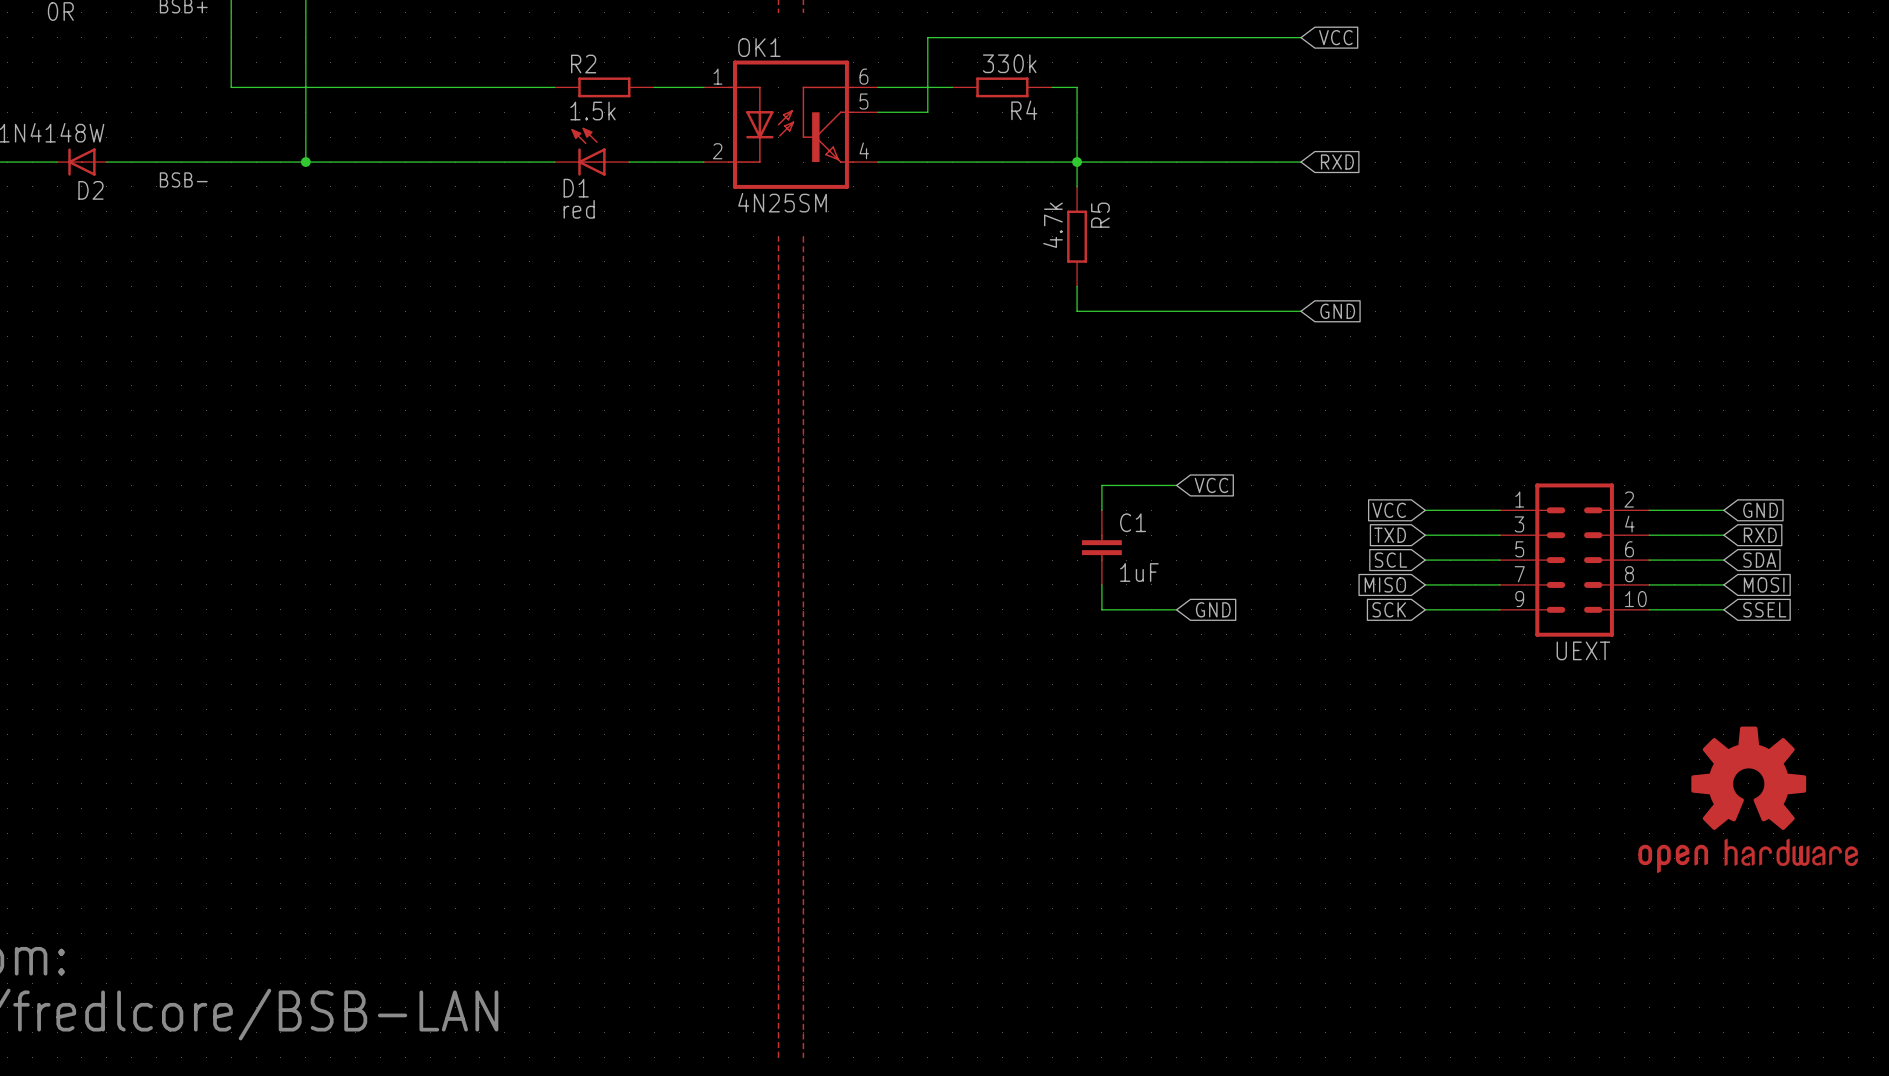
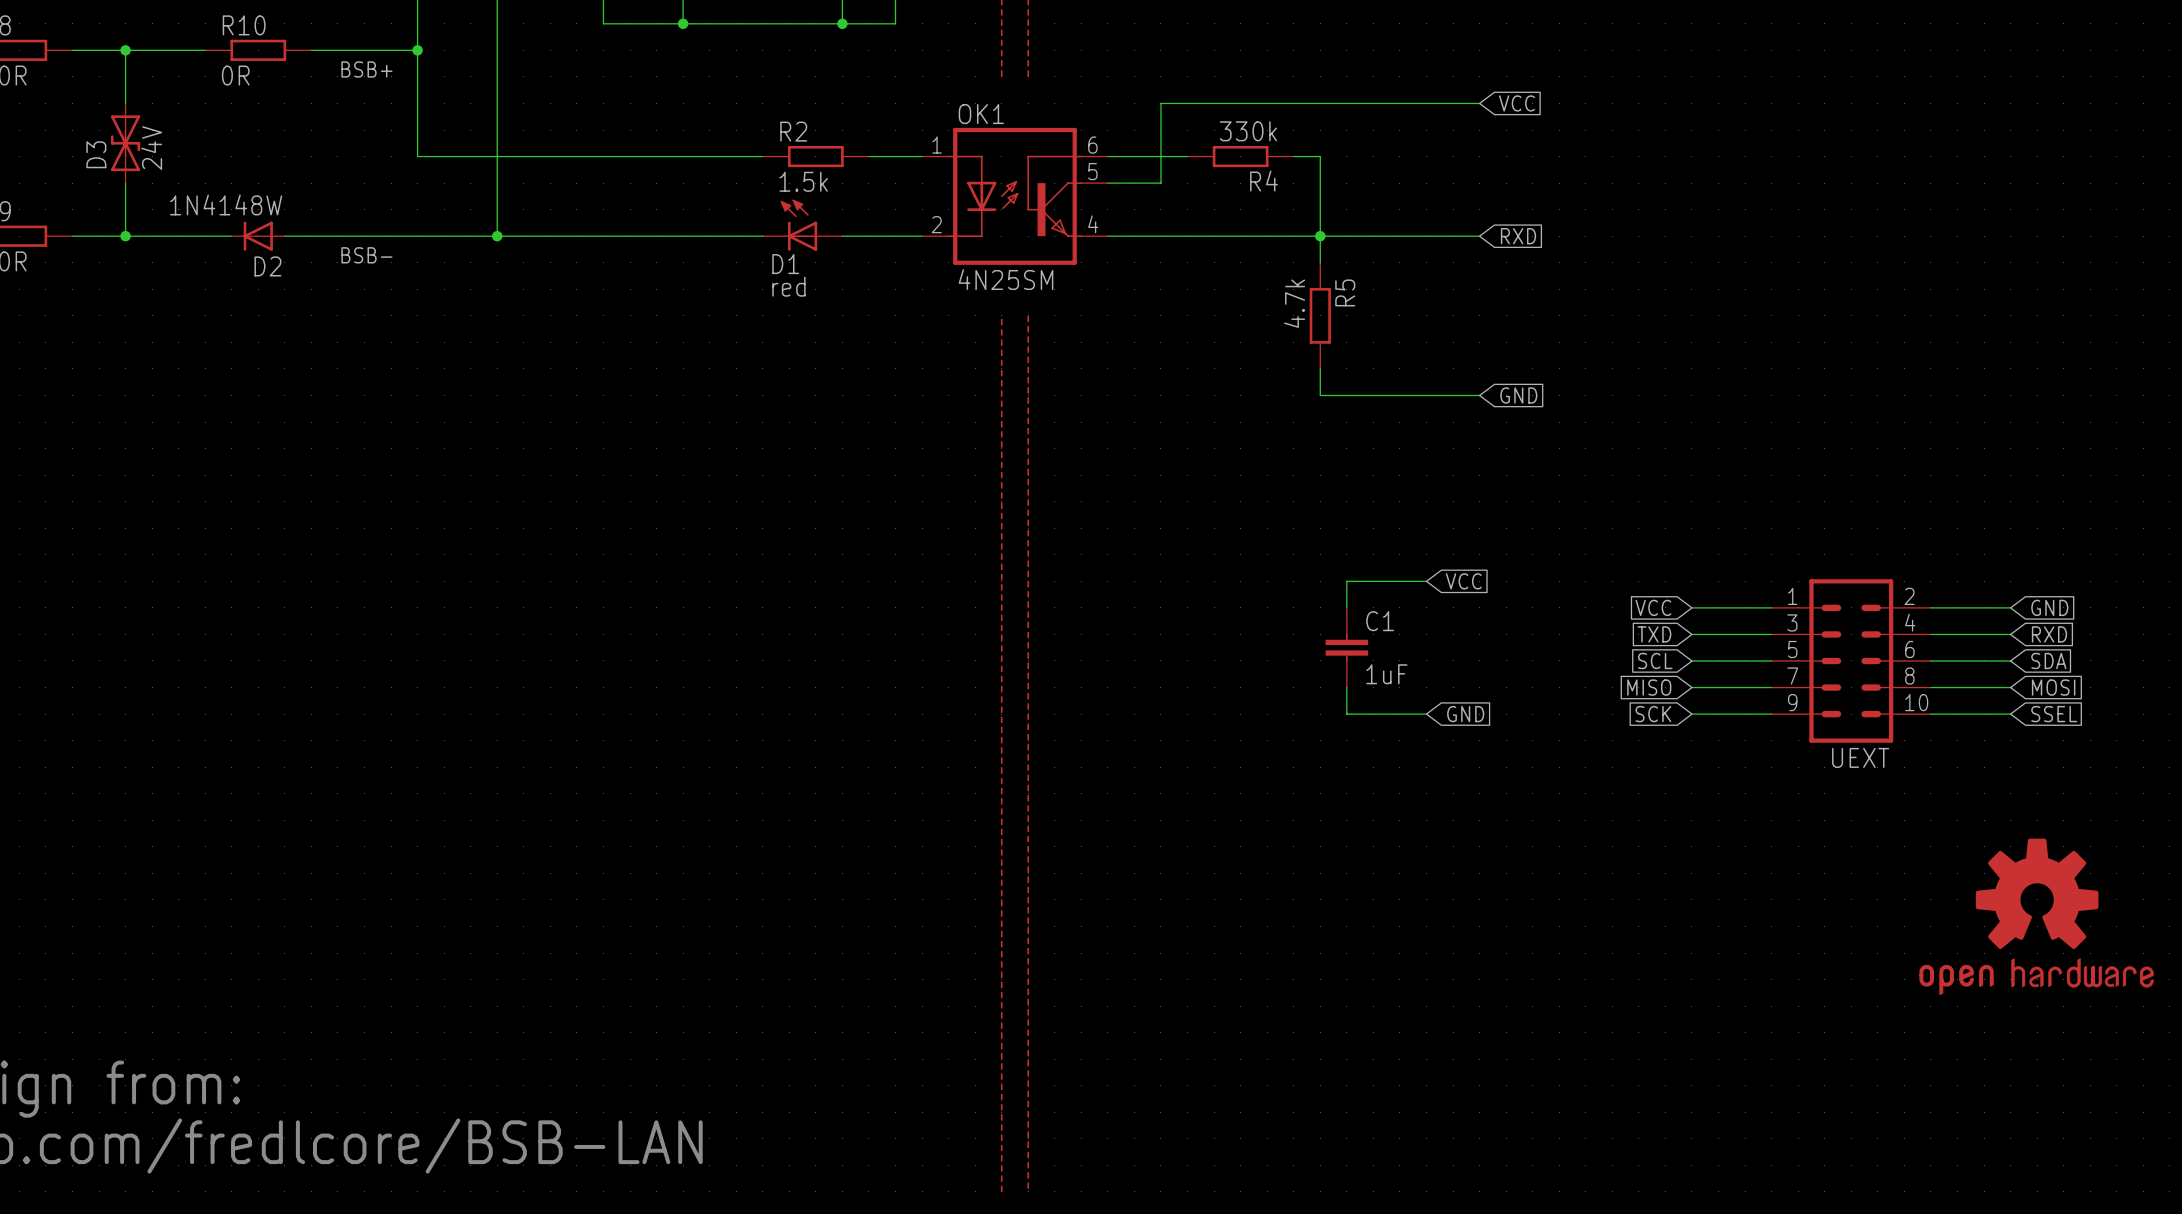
wire: (1226, 37) (1300, 37) -> none
global label position: VCC (1335, 37) -> VCC (1516, 103)
wire: (1226, 162) (1300, 162) -> none
global label position: RXD (1337, 162) -> RXD (1518, 236)
wire: (1226, 311) (1300, 311) -> none
global label position: GND (1337, 311) -> GND (1518, 395)

